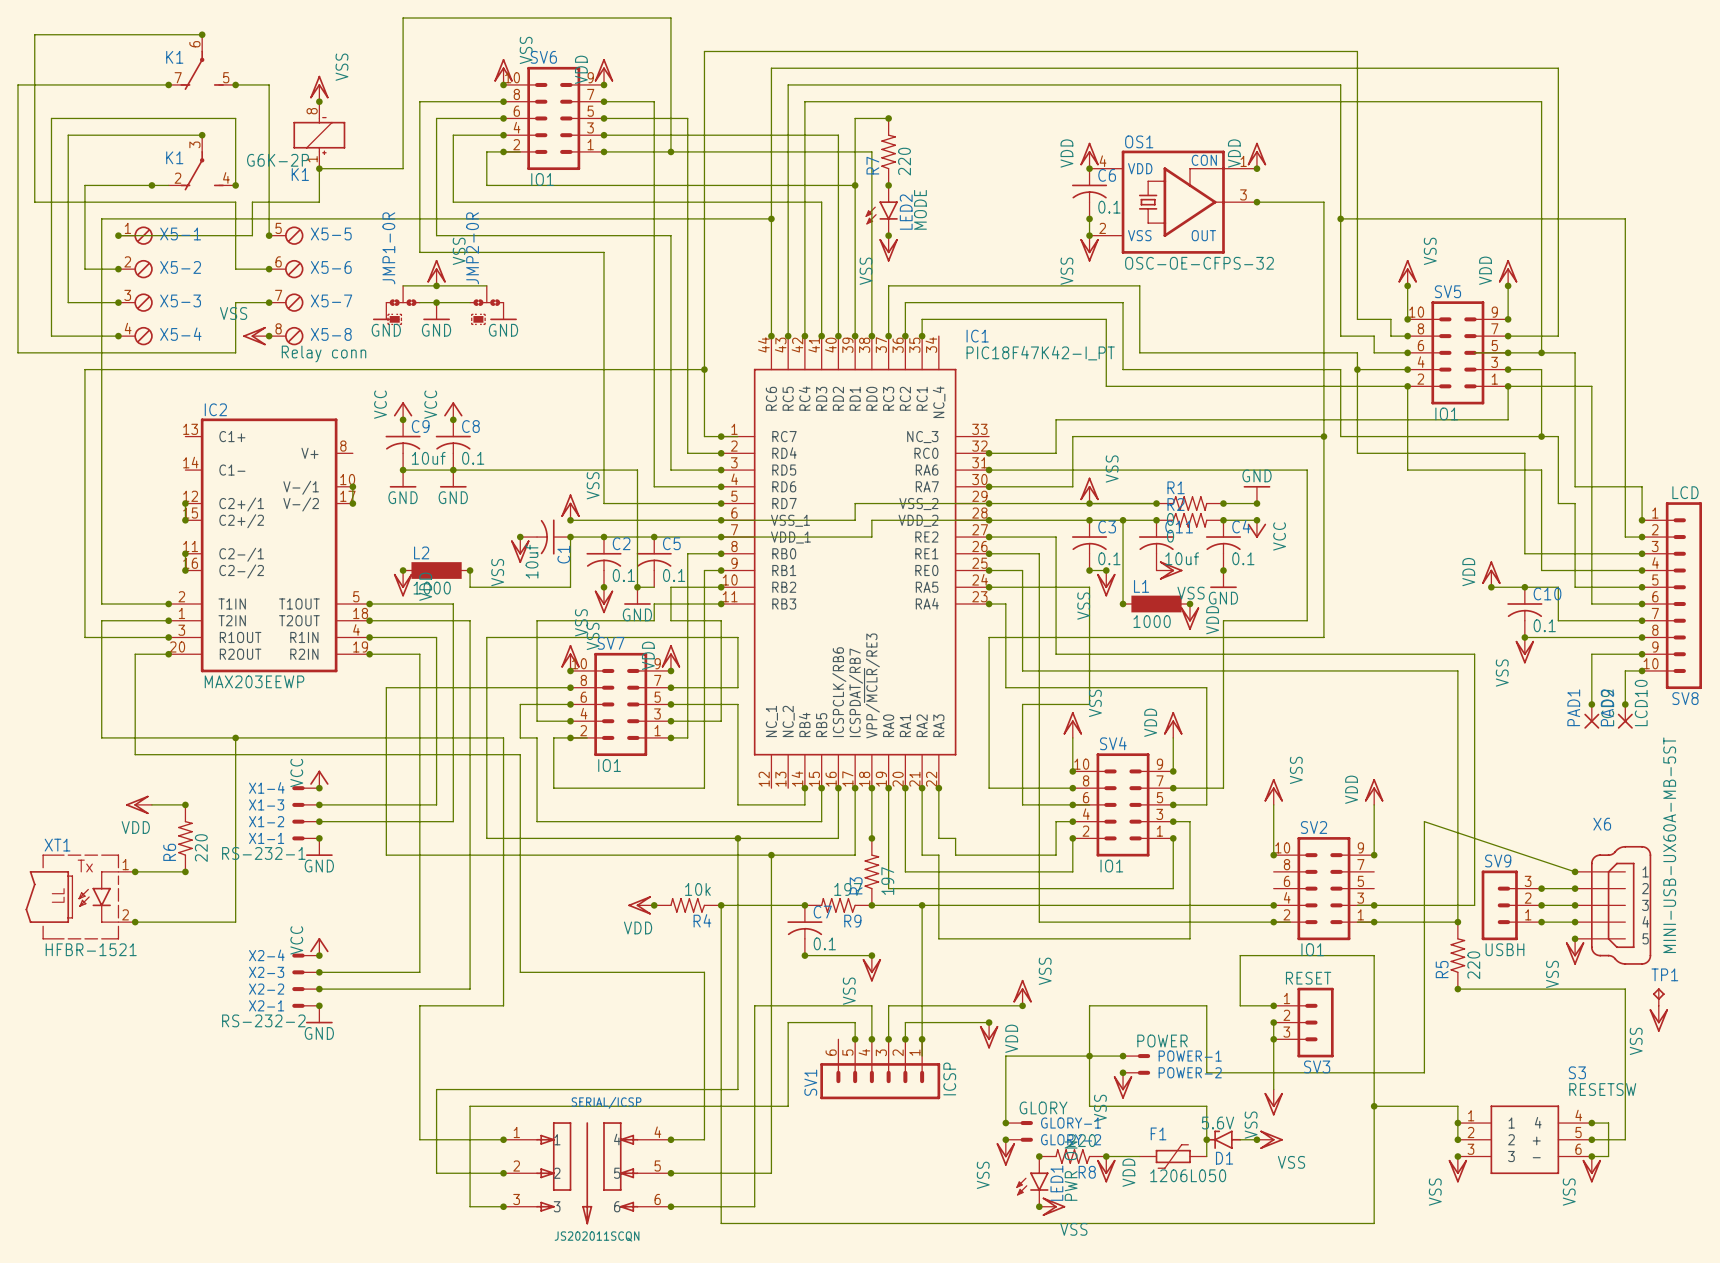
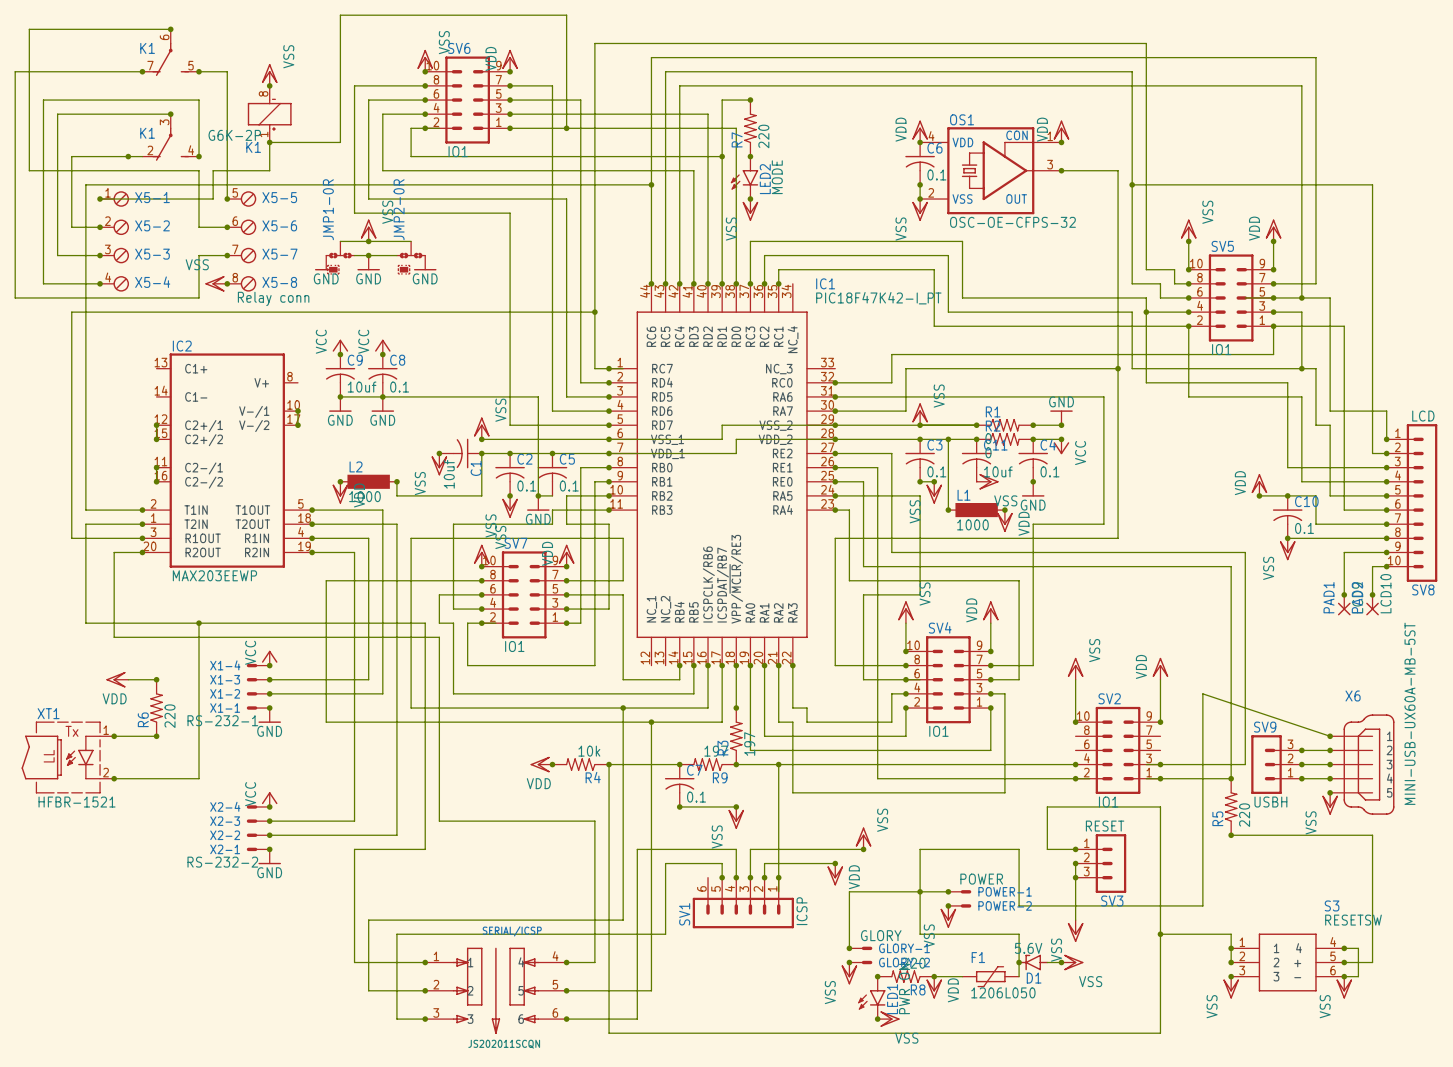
TP1: (1658, 997) -> none
power symbol: VSS (1658, 1018) -> none

